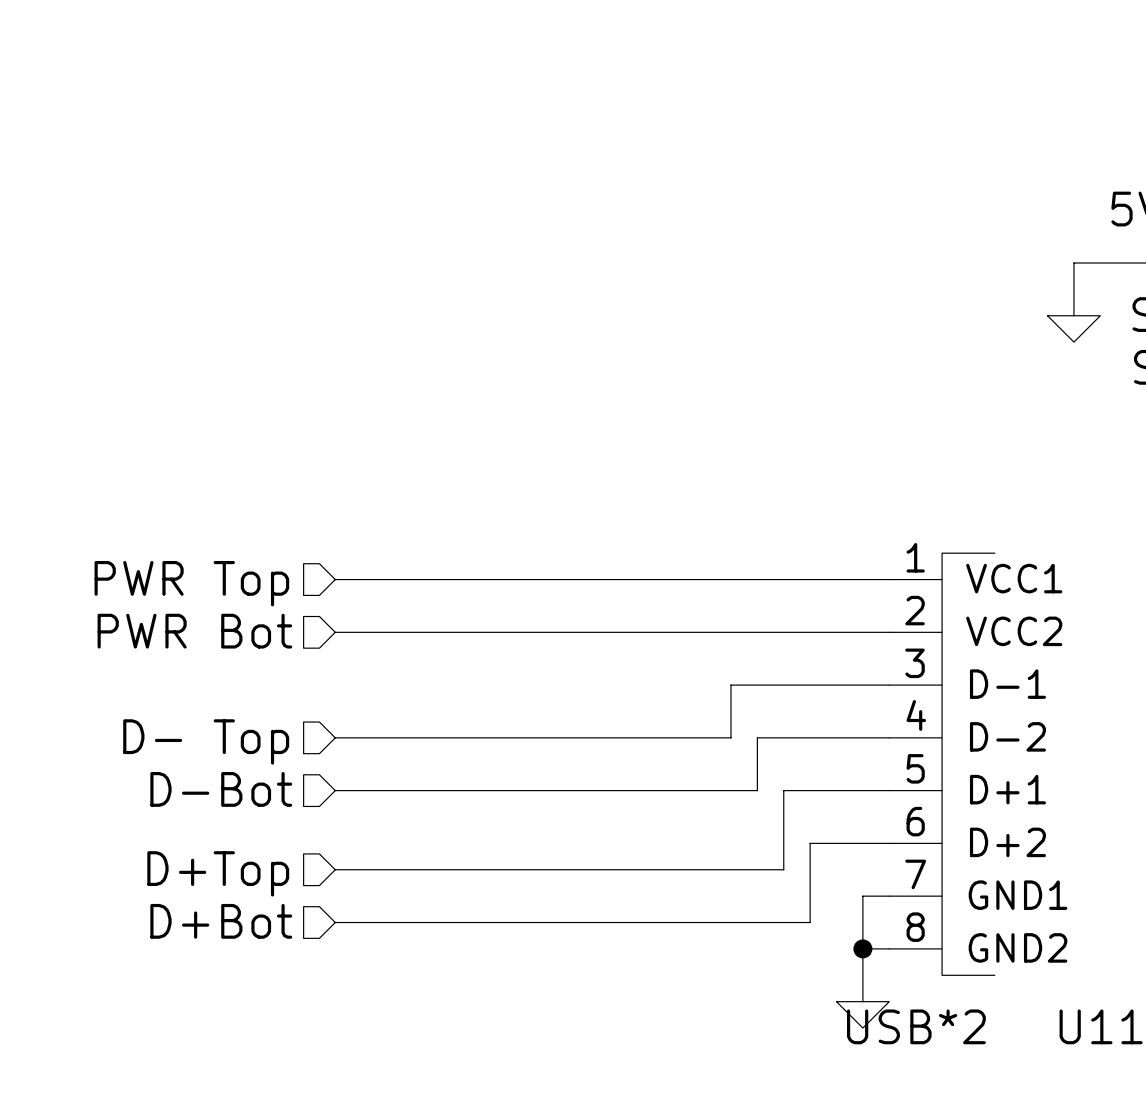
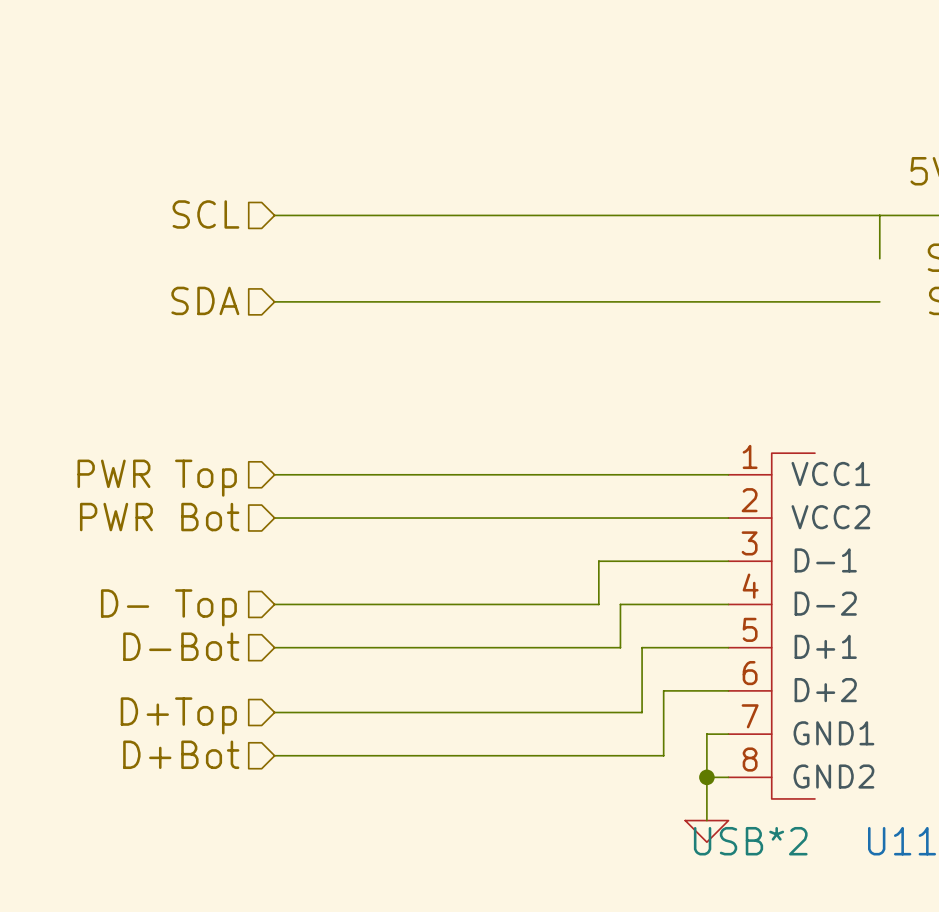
hierarchical label: none -> SCL (205, 214)
wire: none -> (274, 215) (879, 215)
power symbol: (1073, 328) -> none
hierarchical label: none -> SDA (205, 300)
wire: none -> (274, 301) (879, 301)

